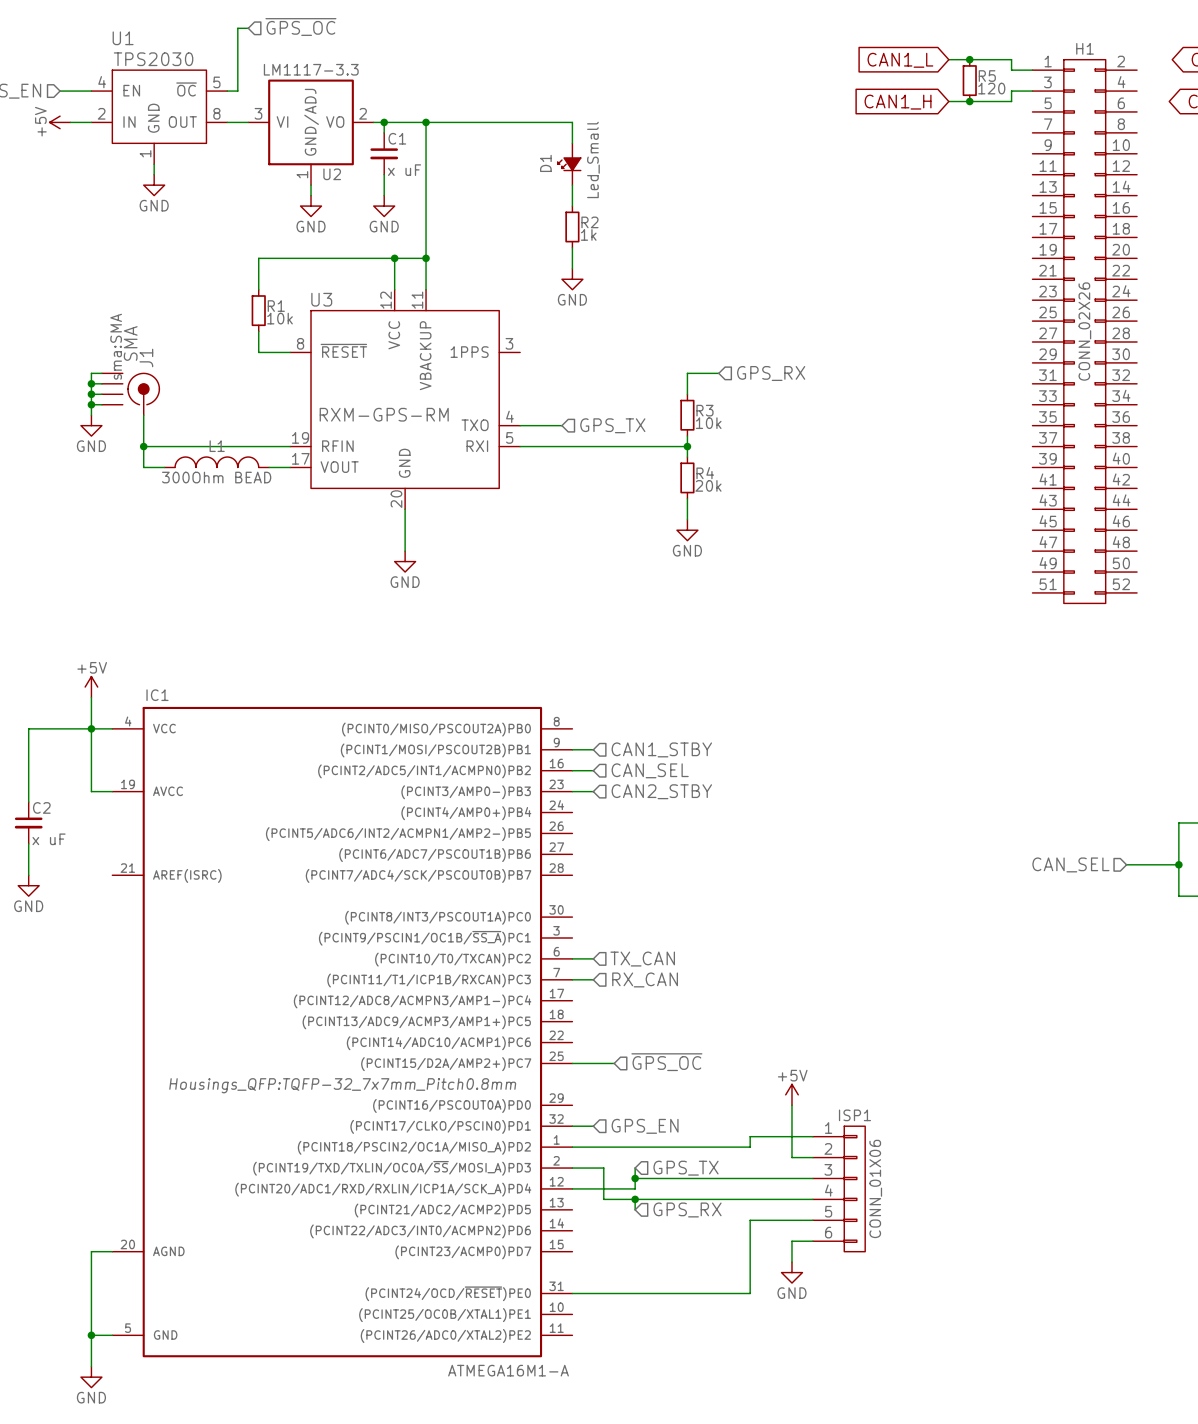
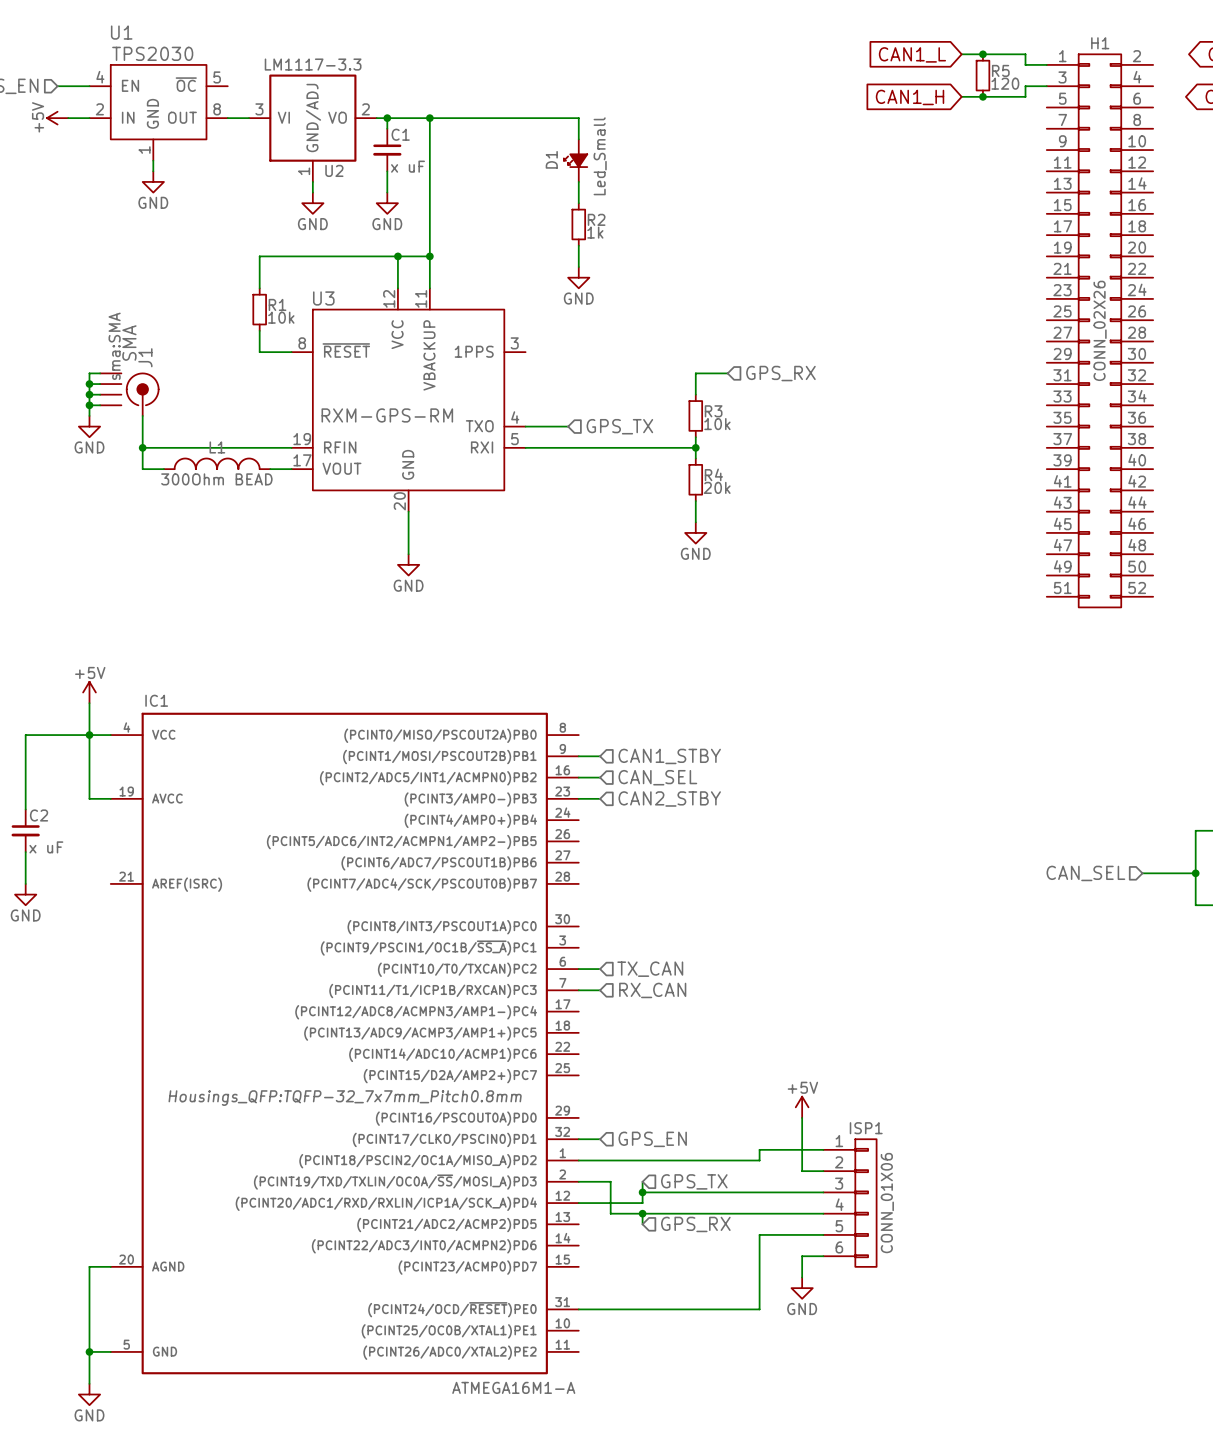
hierarchical label: ~{GPS_OC} (300, 27) -> none
wire: (248, 28) (237, 28) (237, 91) (227, 91) -> none
hierarchical label: ~{GPS_OC} (666, 1062) -> none
wire: (572, 1063) (614, 1063) -> none

